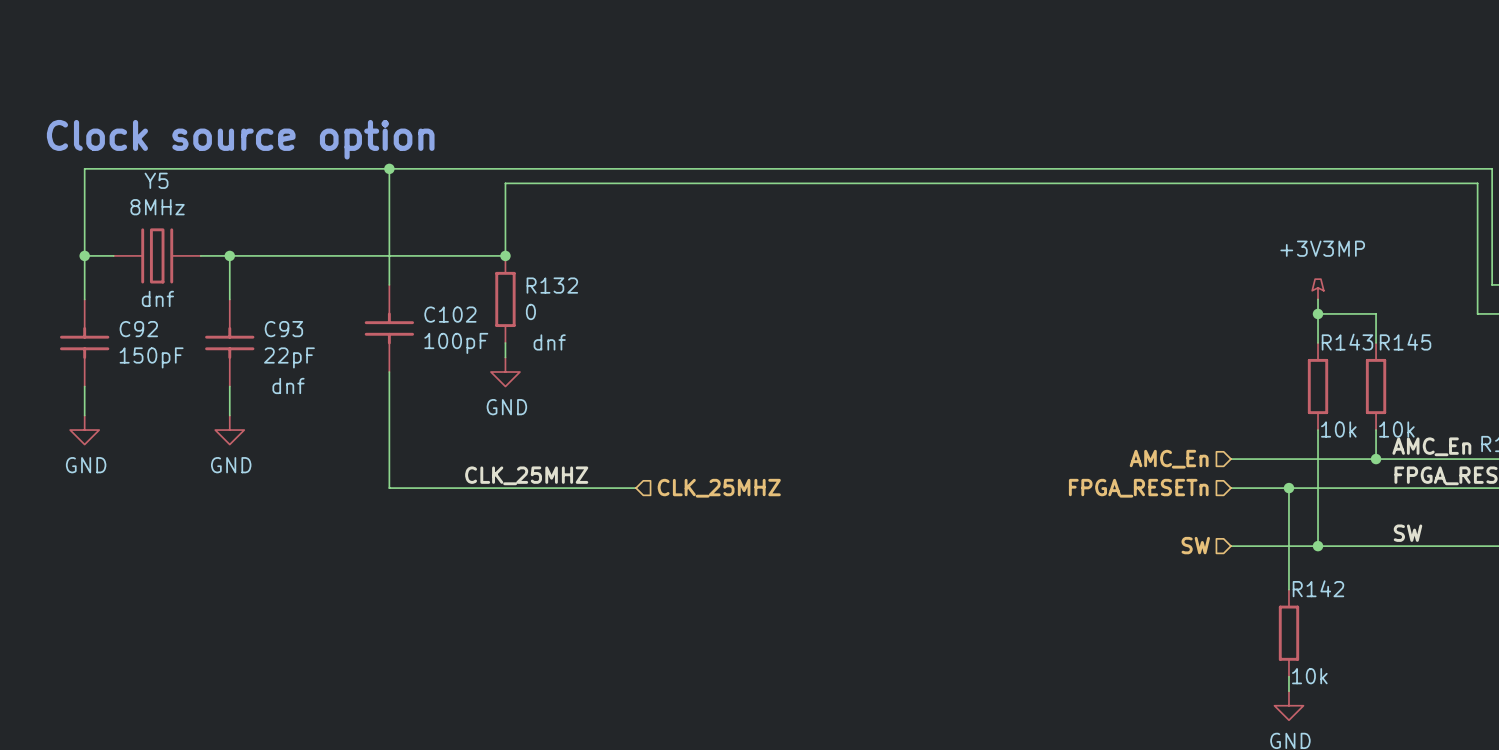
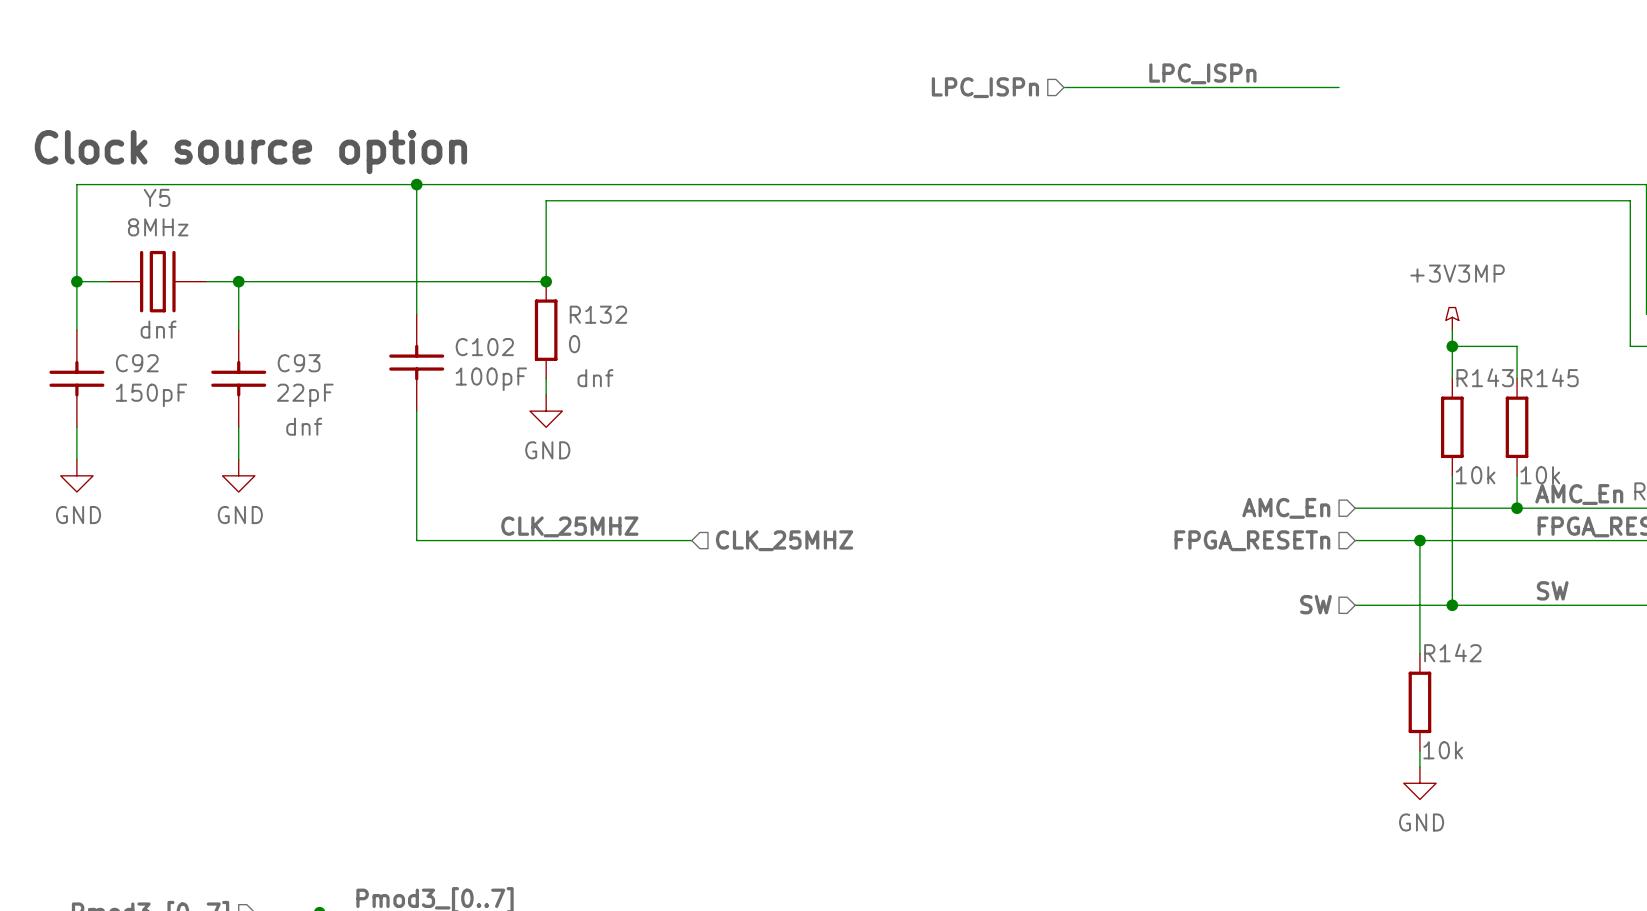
label: none -> LPC_ISPn (1202, 73)
hierarchical label: none -> LPC_ISPn (985, 87)
wire: none -> (1063, 87) (1339, 87)

